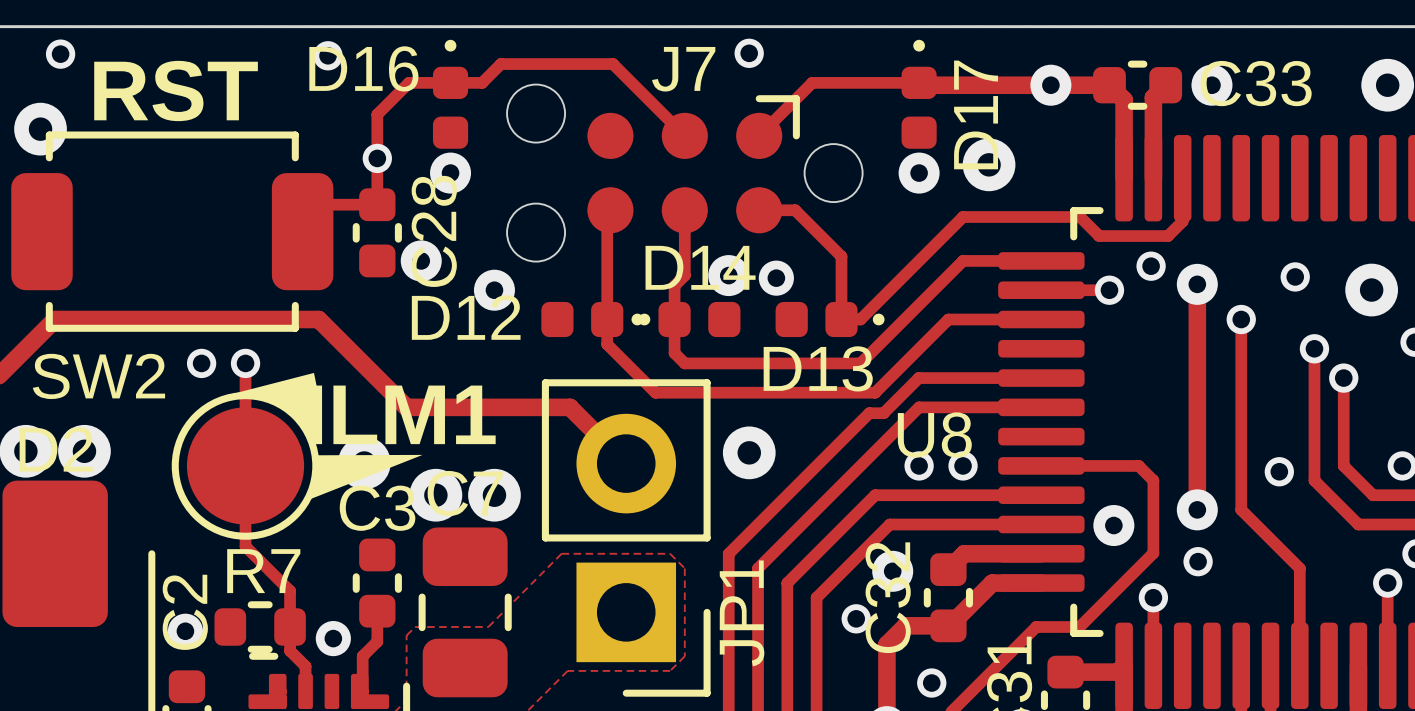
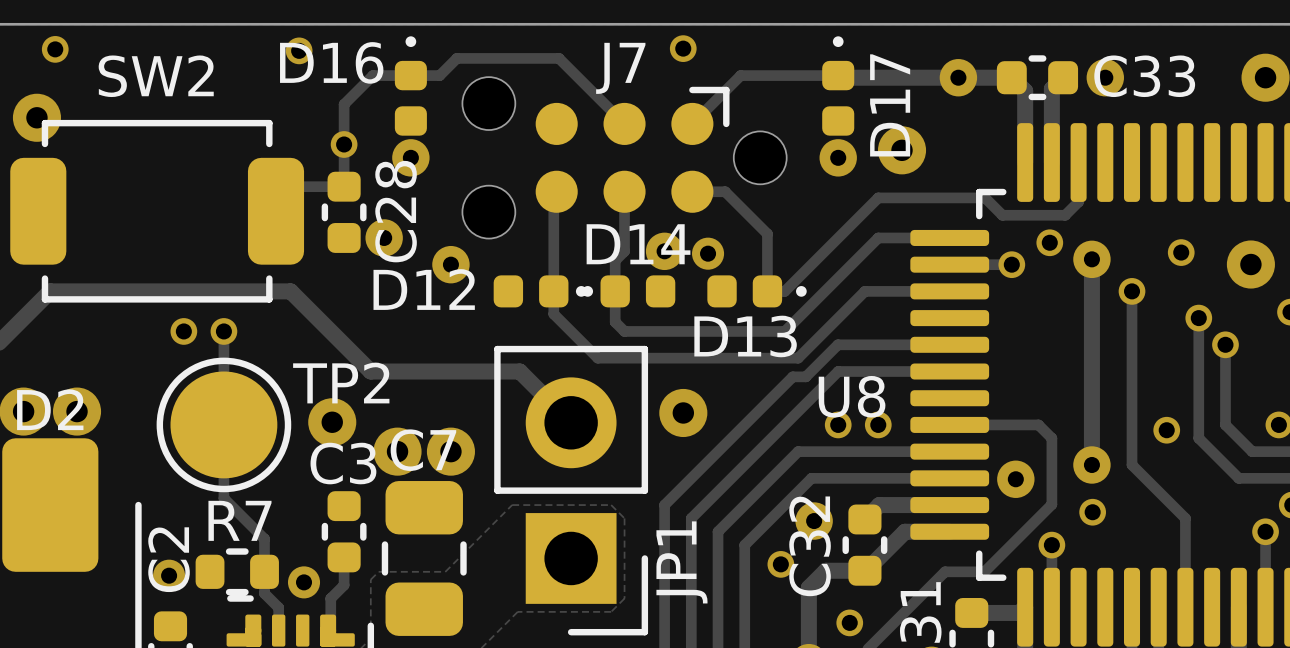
text: RST (176, 90) -> none
drawing: [221, 372, 423, 501] -> none
SW2 name position: SW2 (98, 376) -> SW2 (156, 76)
text: ILM1 (402, 414) -> none
TP2 name: none -> TP2 (341, 383)

